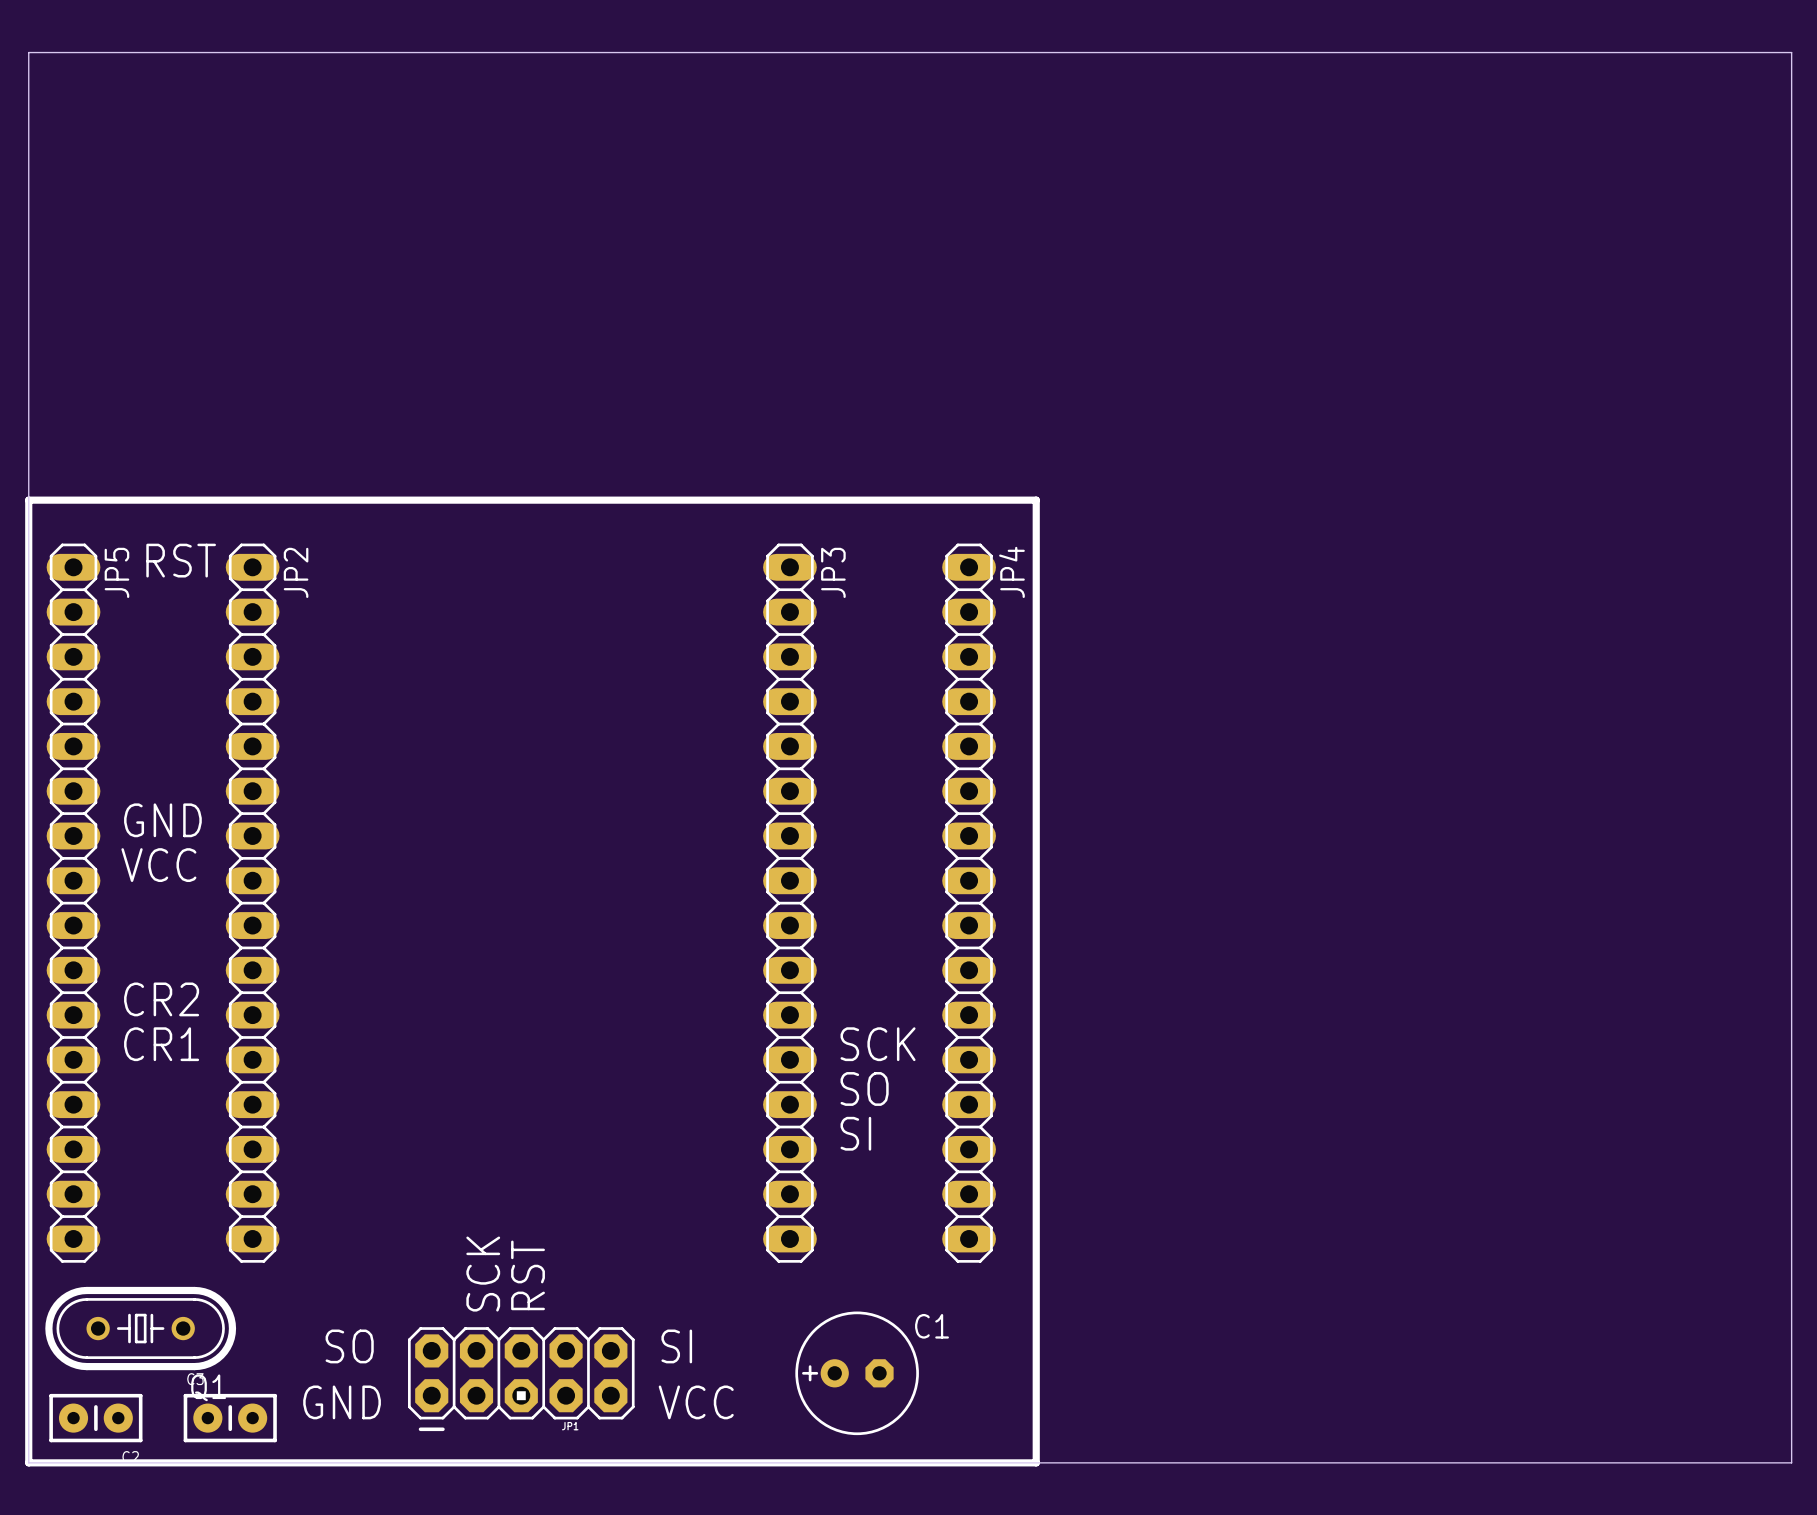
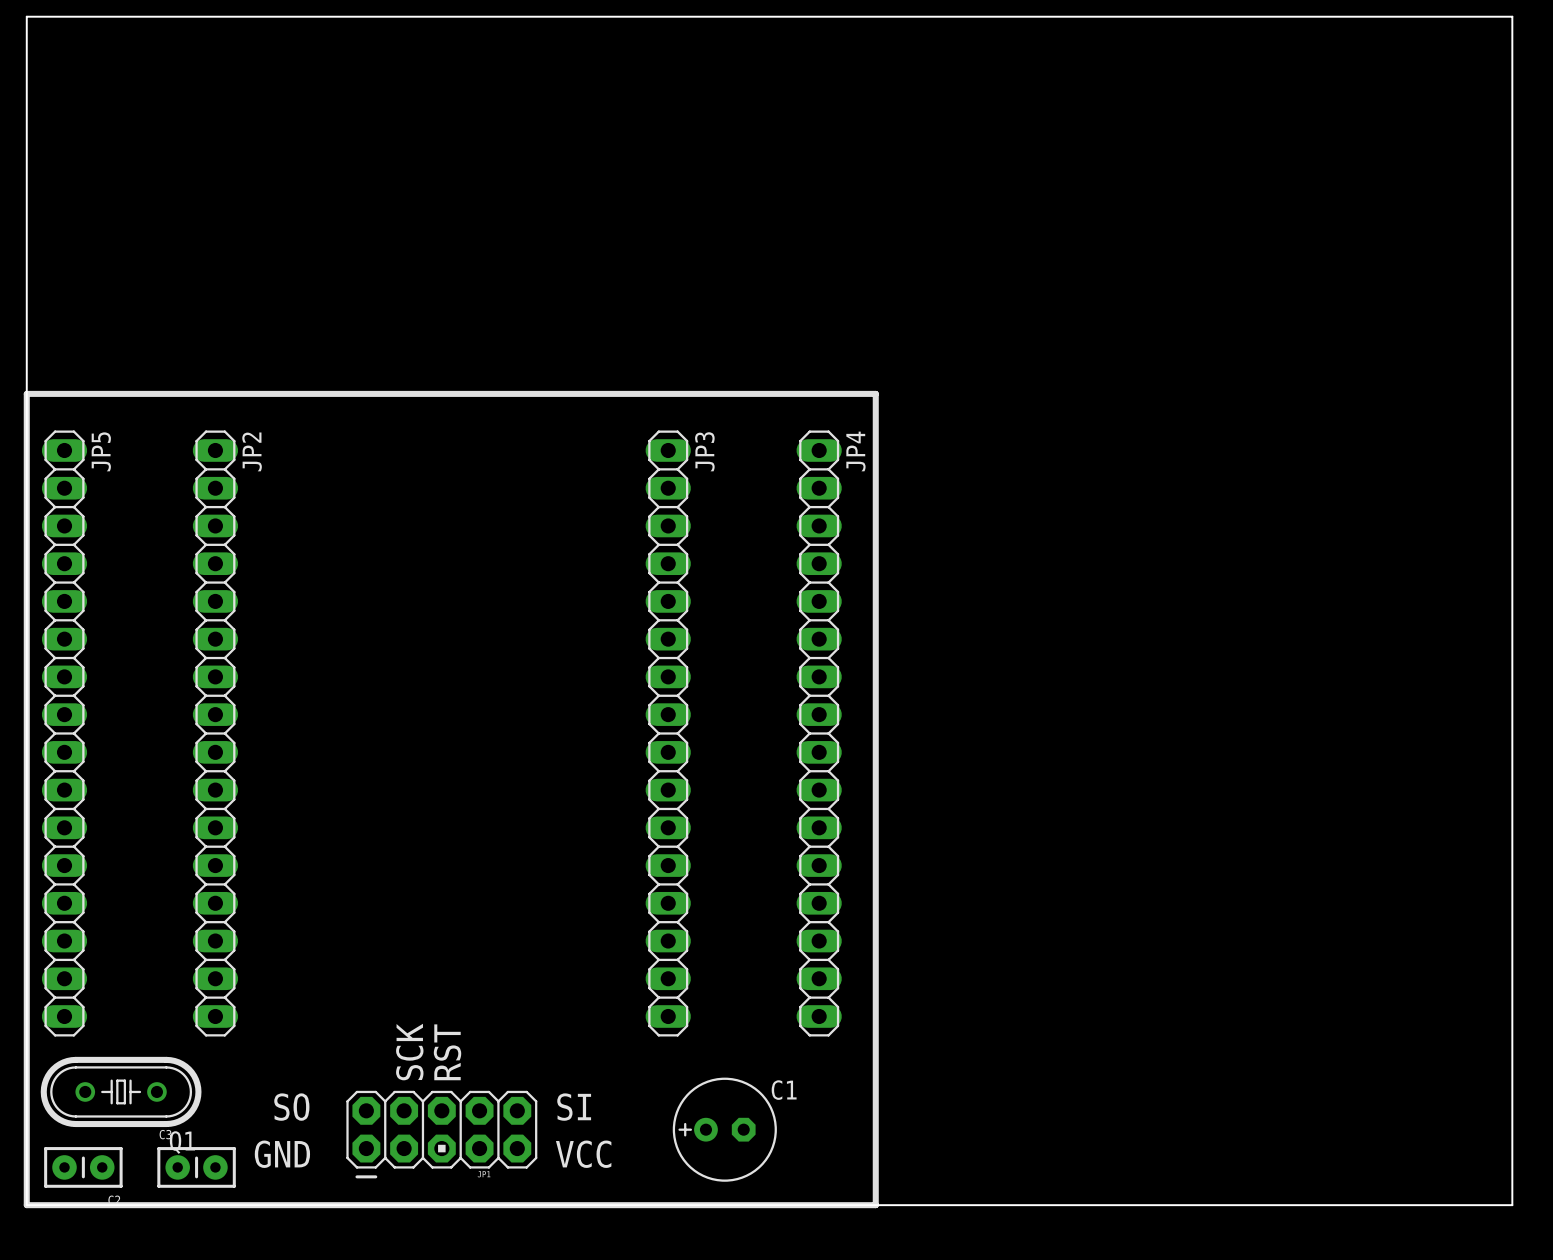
text: RST (181, 560) -> none
text: GND (162, 820) -> none
text: VCC (158, 865) -> none
text: CR2 (161, 999) -> none
text: CR1 (161, 1044) -> none
text: SCK (878, 1044) -> none
text: SO (864, 1088) -> none
text: SI (855, 1133) -> none

